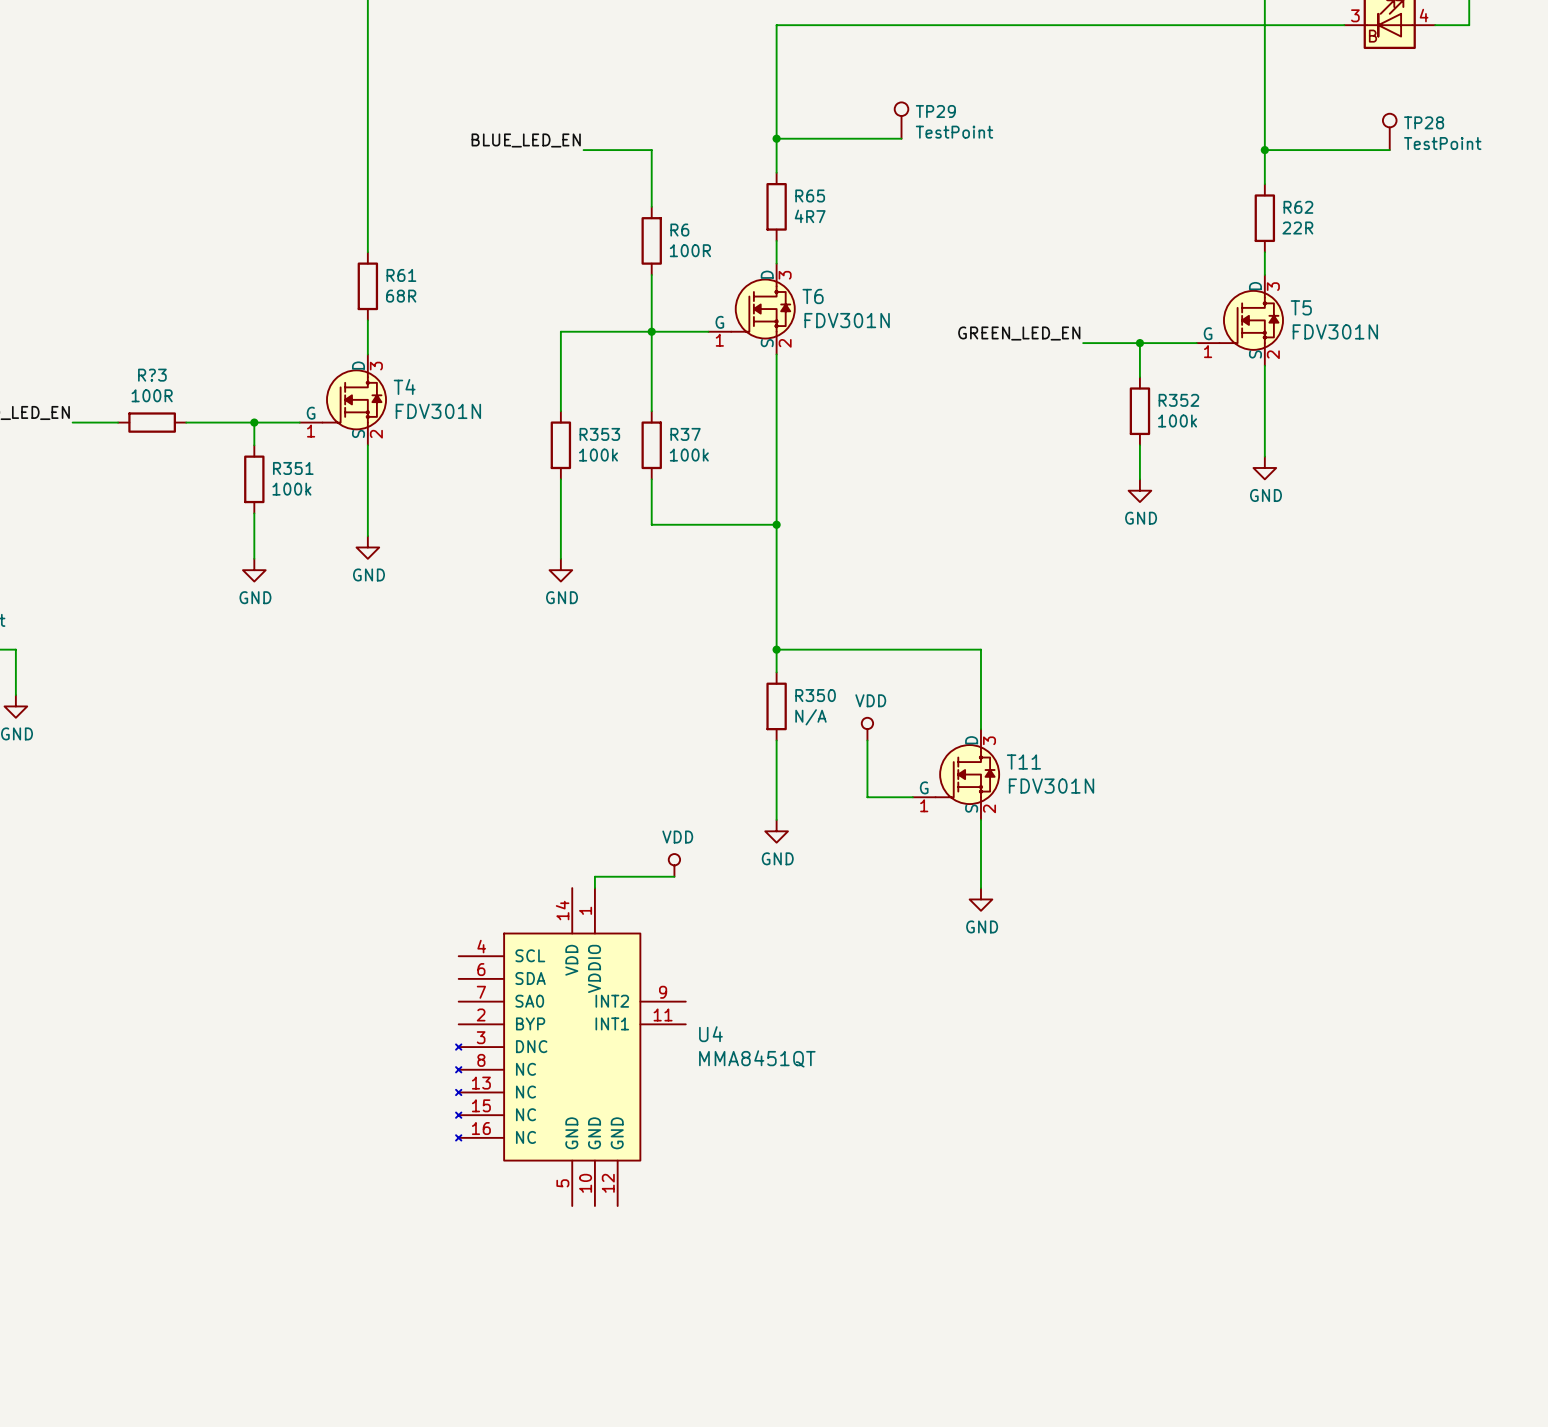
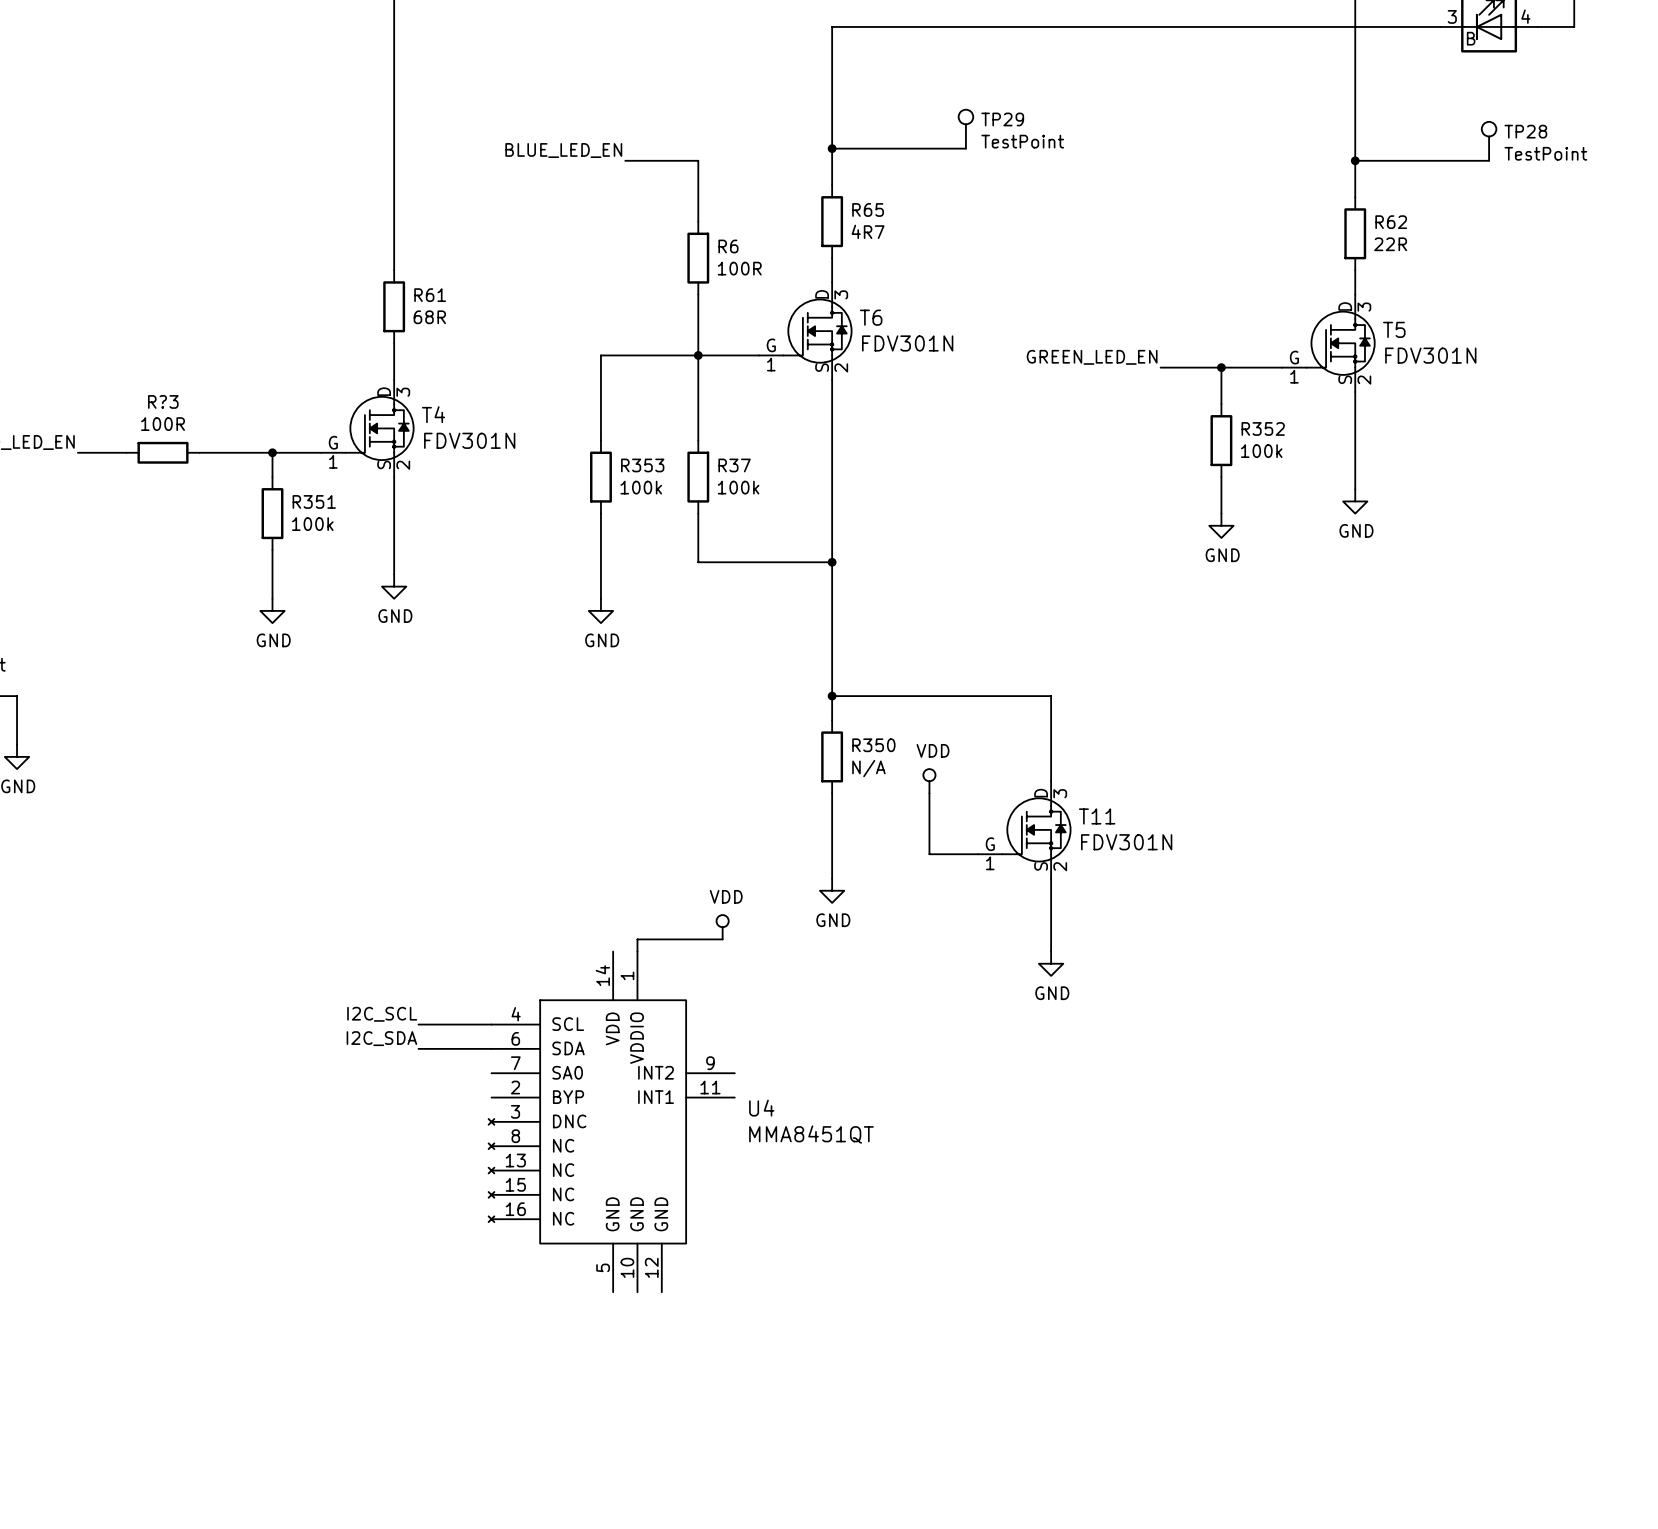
label: none -> I2C_SCL (382, 1014)
wire: none -> (418, 1024) (491, 1024)
label: none -> I2C_SDA (381, 1038)
wire: none -> (418, 1048) (491, 1048)

